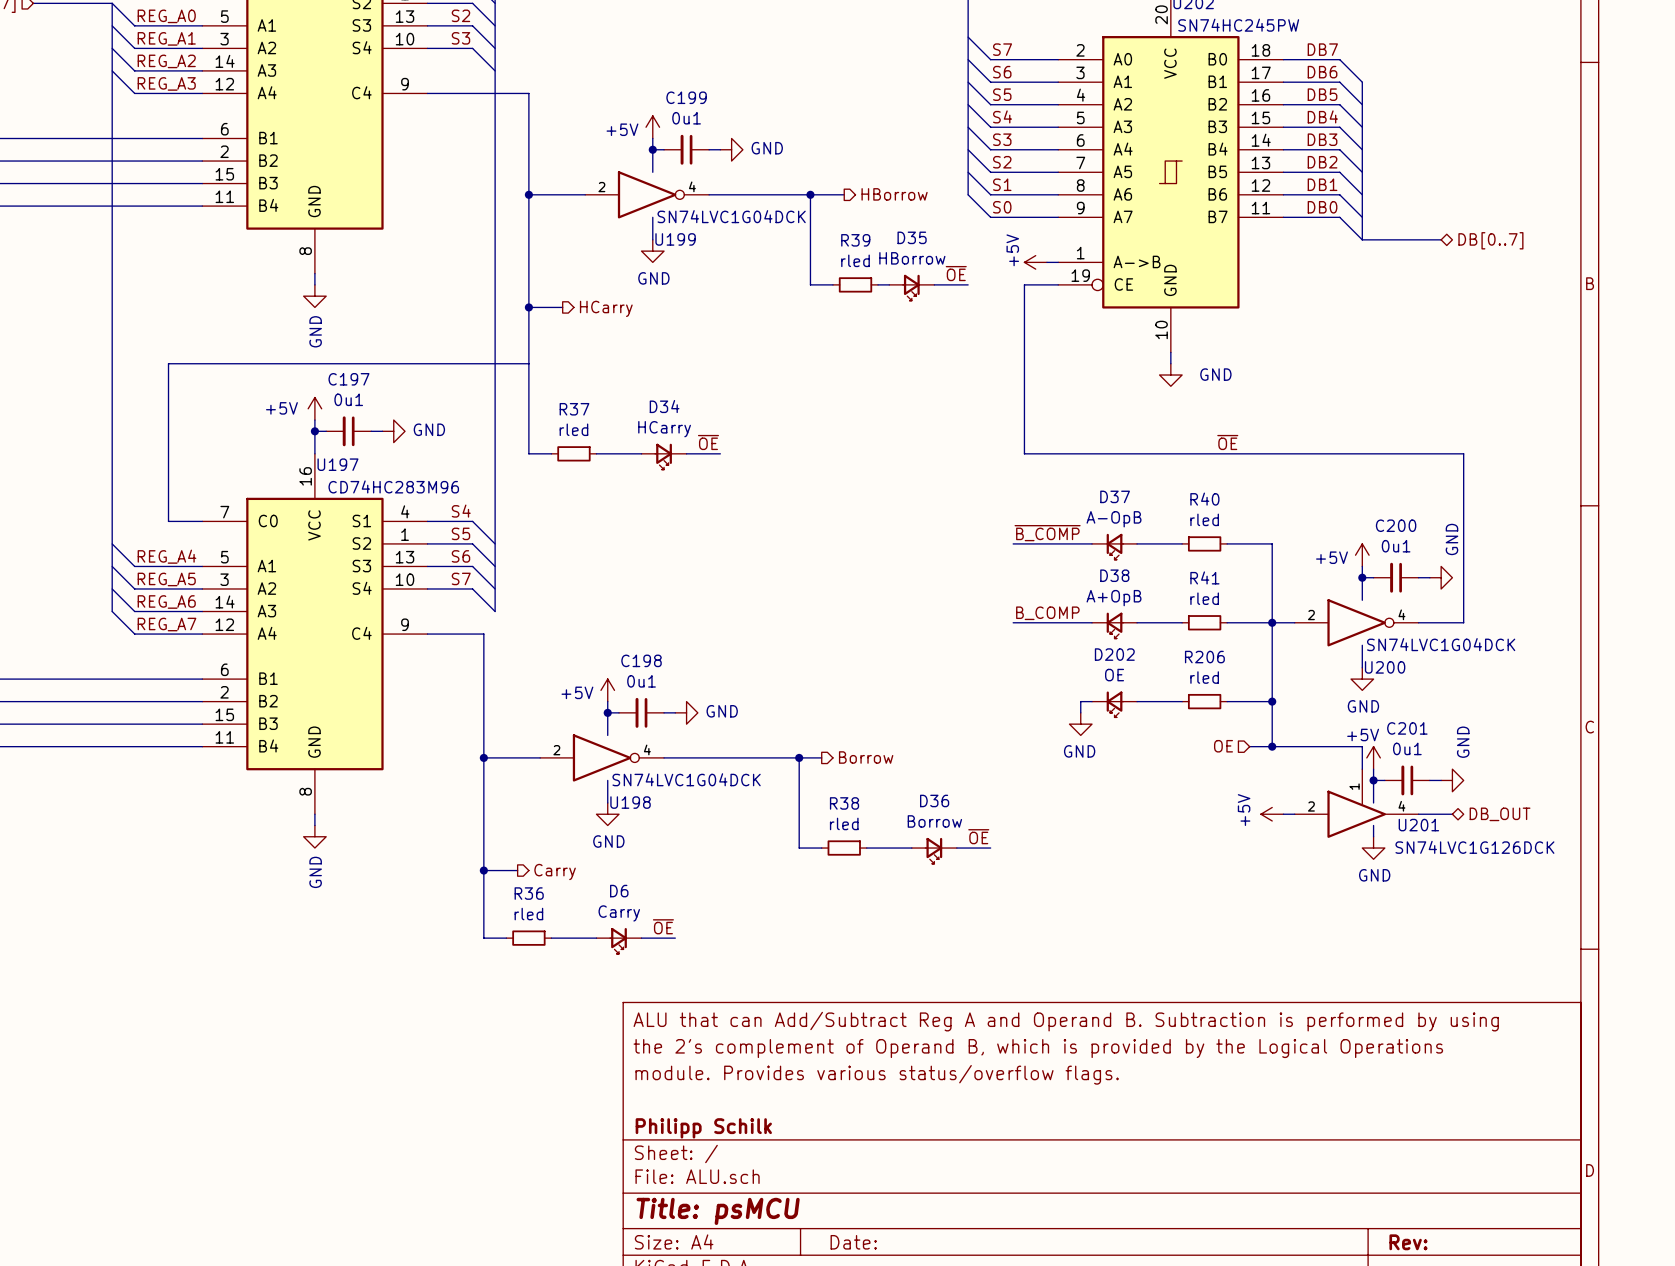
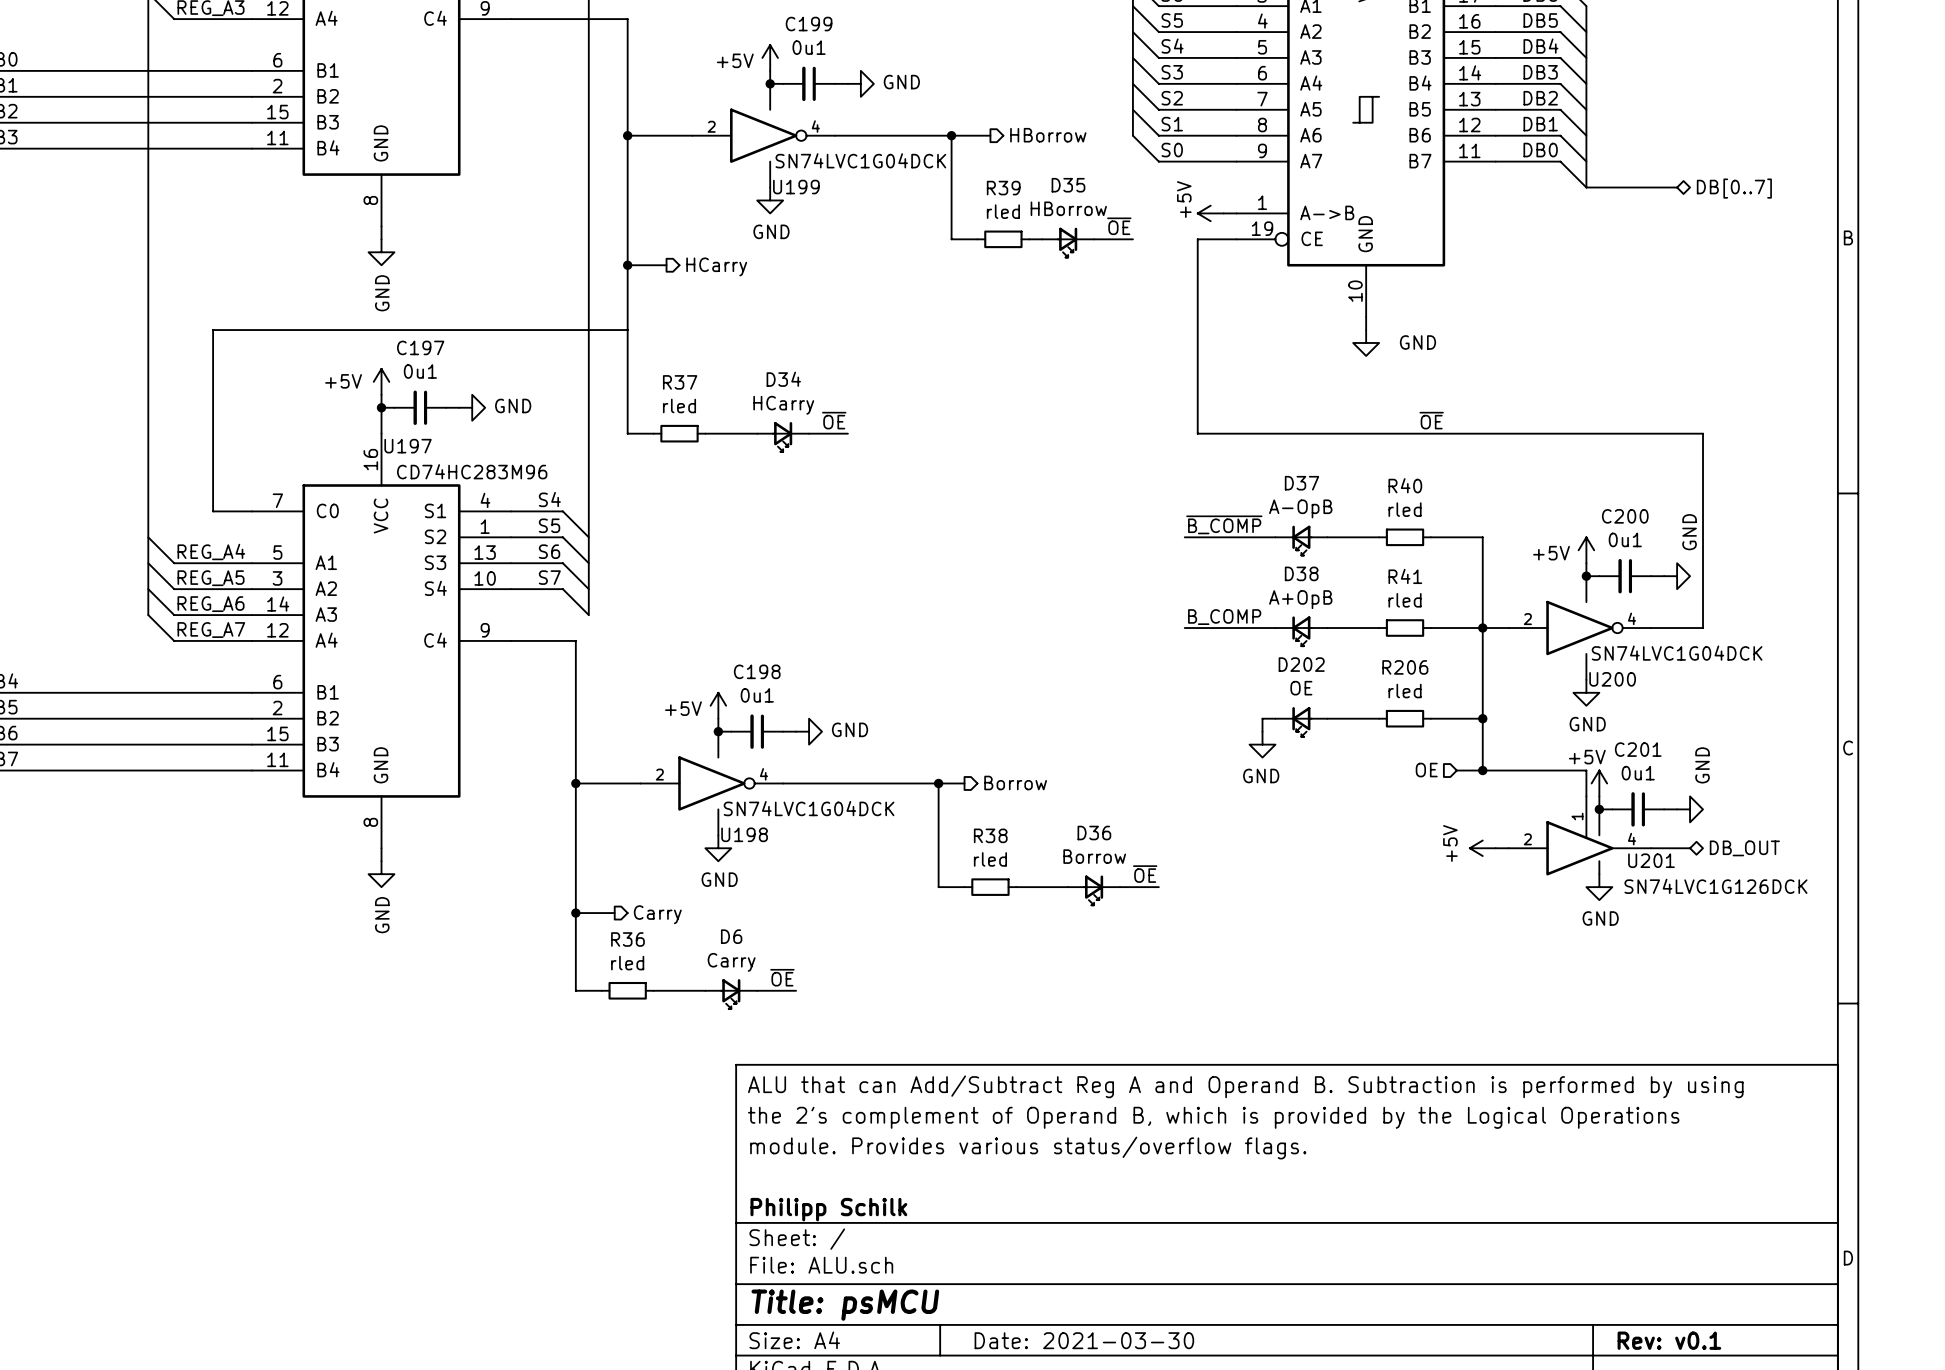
title block: Date: (853, 1242) -> Date: 2021-03-30 (1084, 1340)
title block: Rev: (1408, 1242) -> Rev: v0.1 (1669, 1340)

